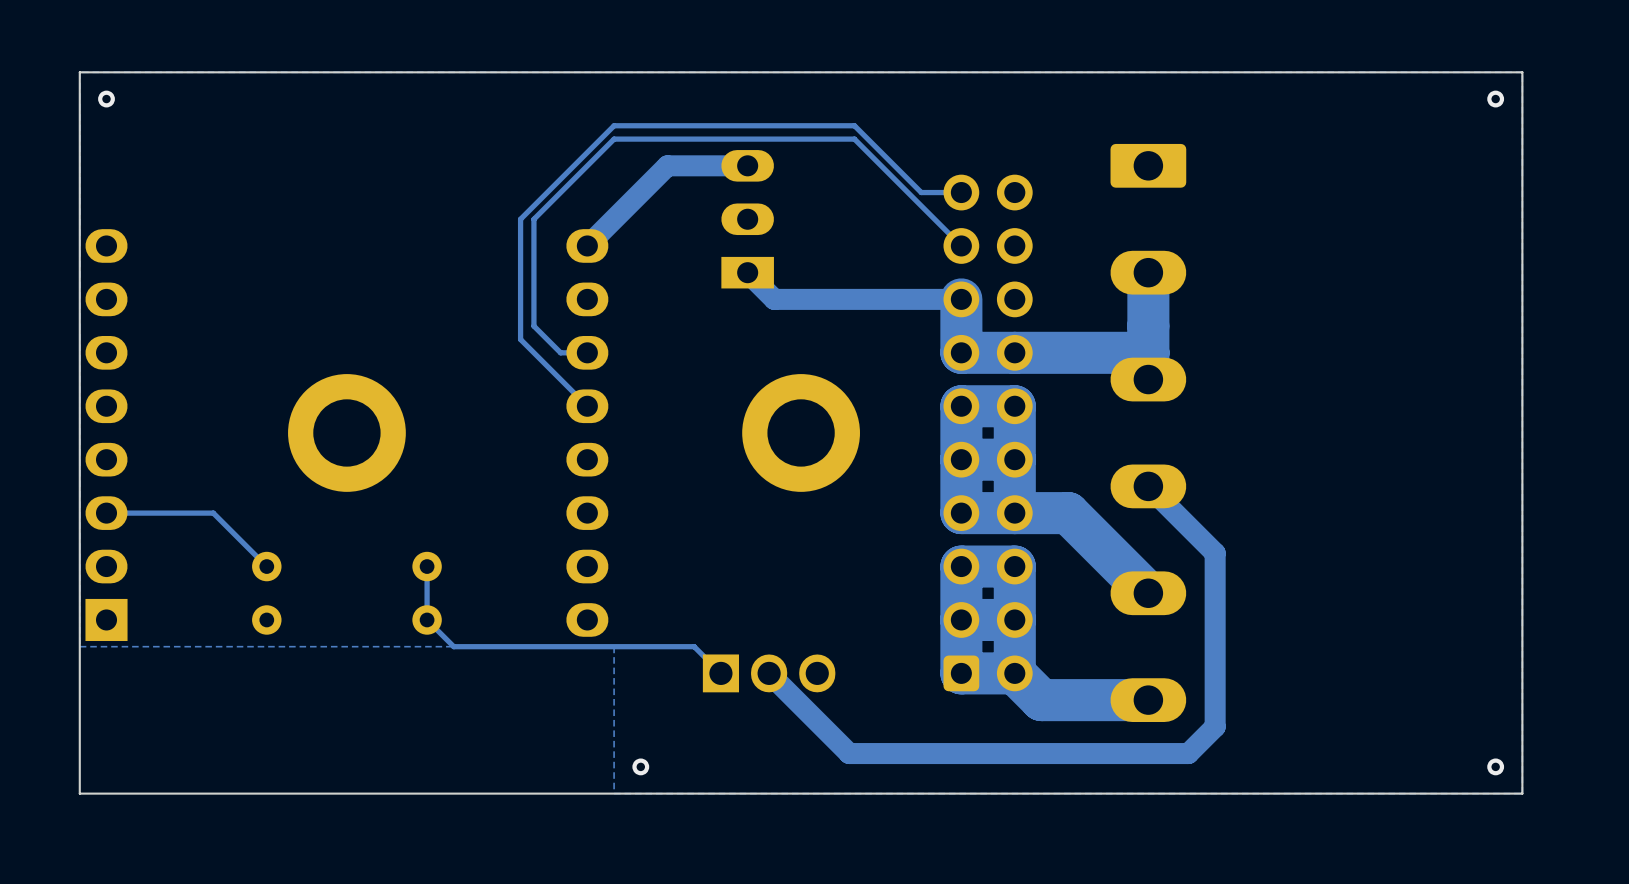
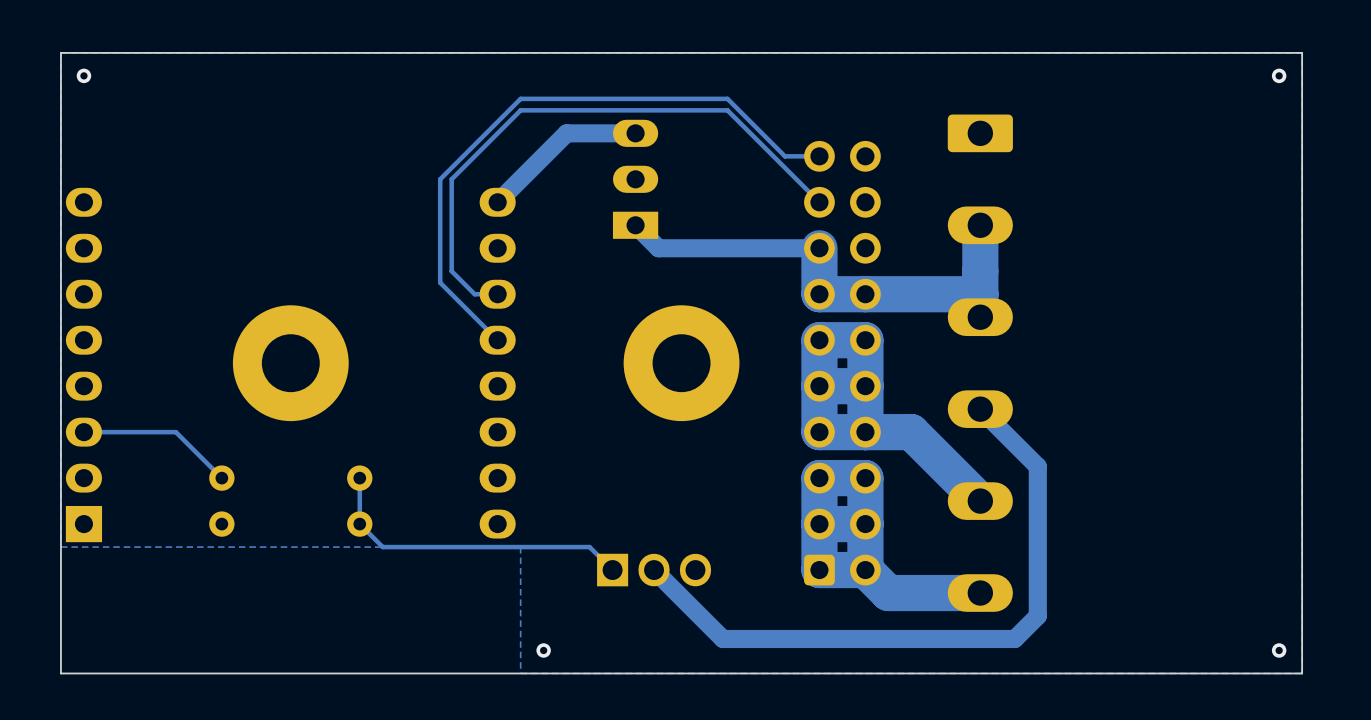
part footprint: [288, 374, 406, 492] -> [232, 305, 349, 422]
part footprint: [742, 374, 860, 492] -> [623, 305, 740, 422]

